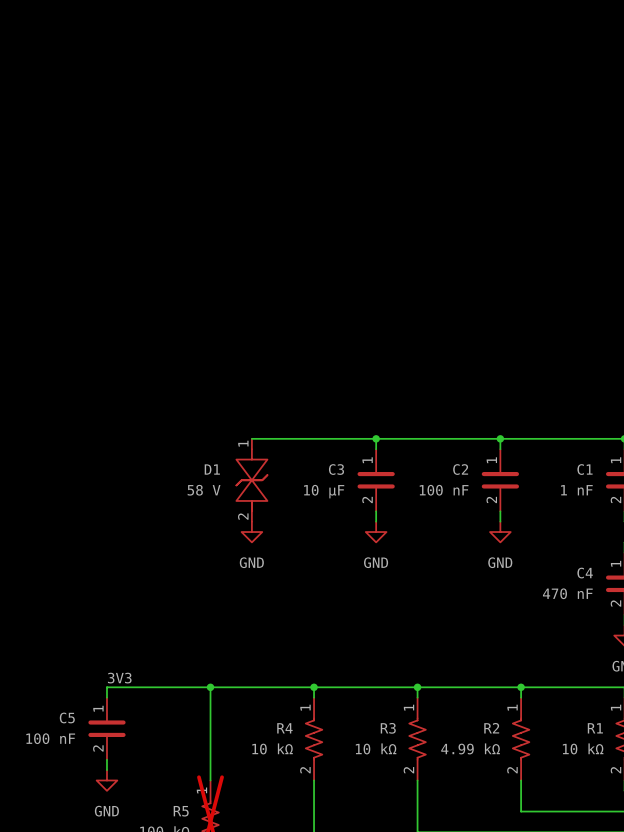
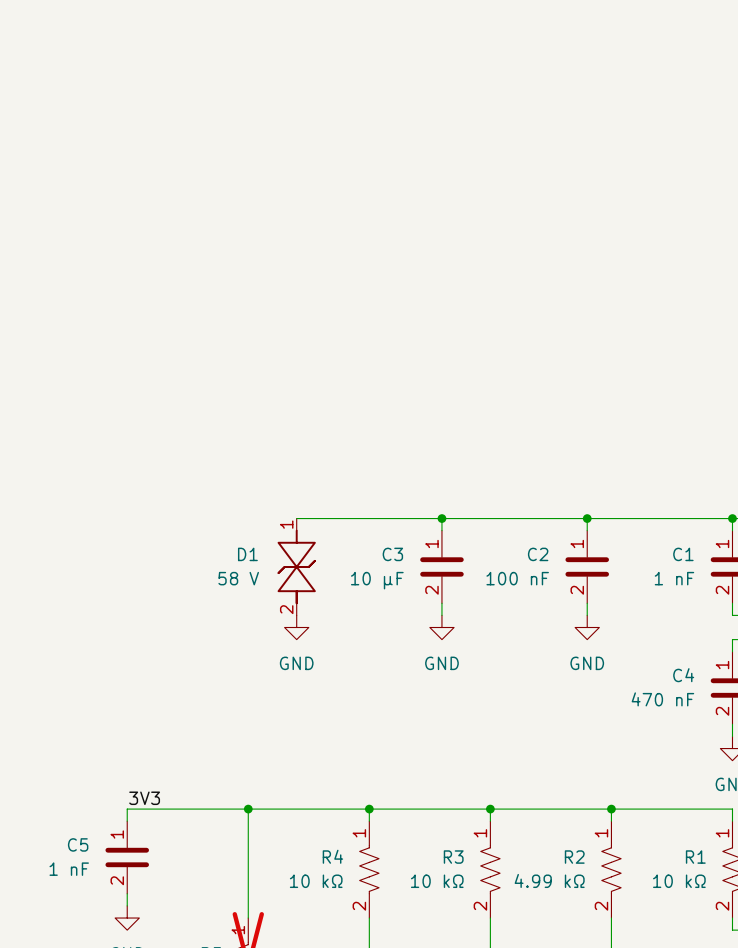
C5 value: 100 nF (50, 738) -> 1 nF (69, 869)

